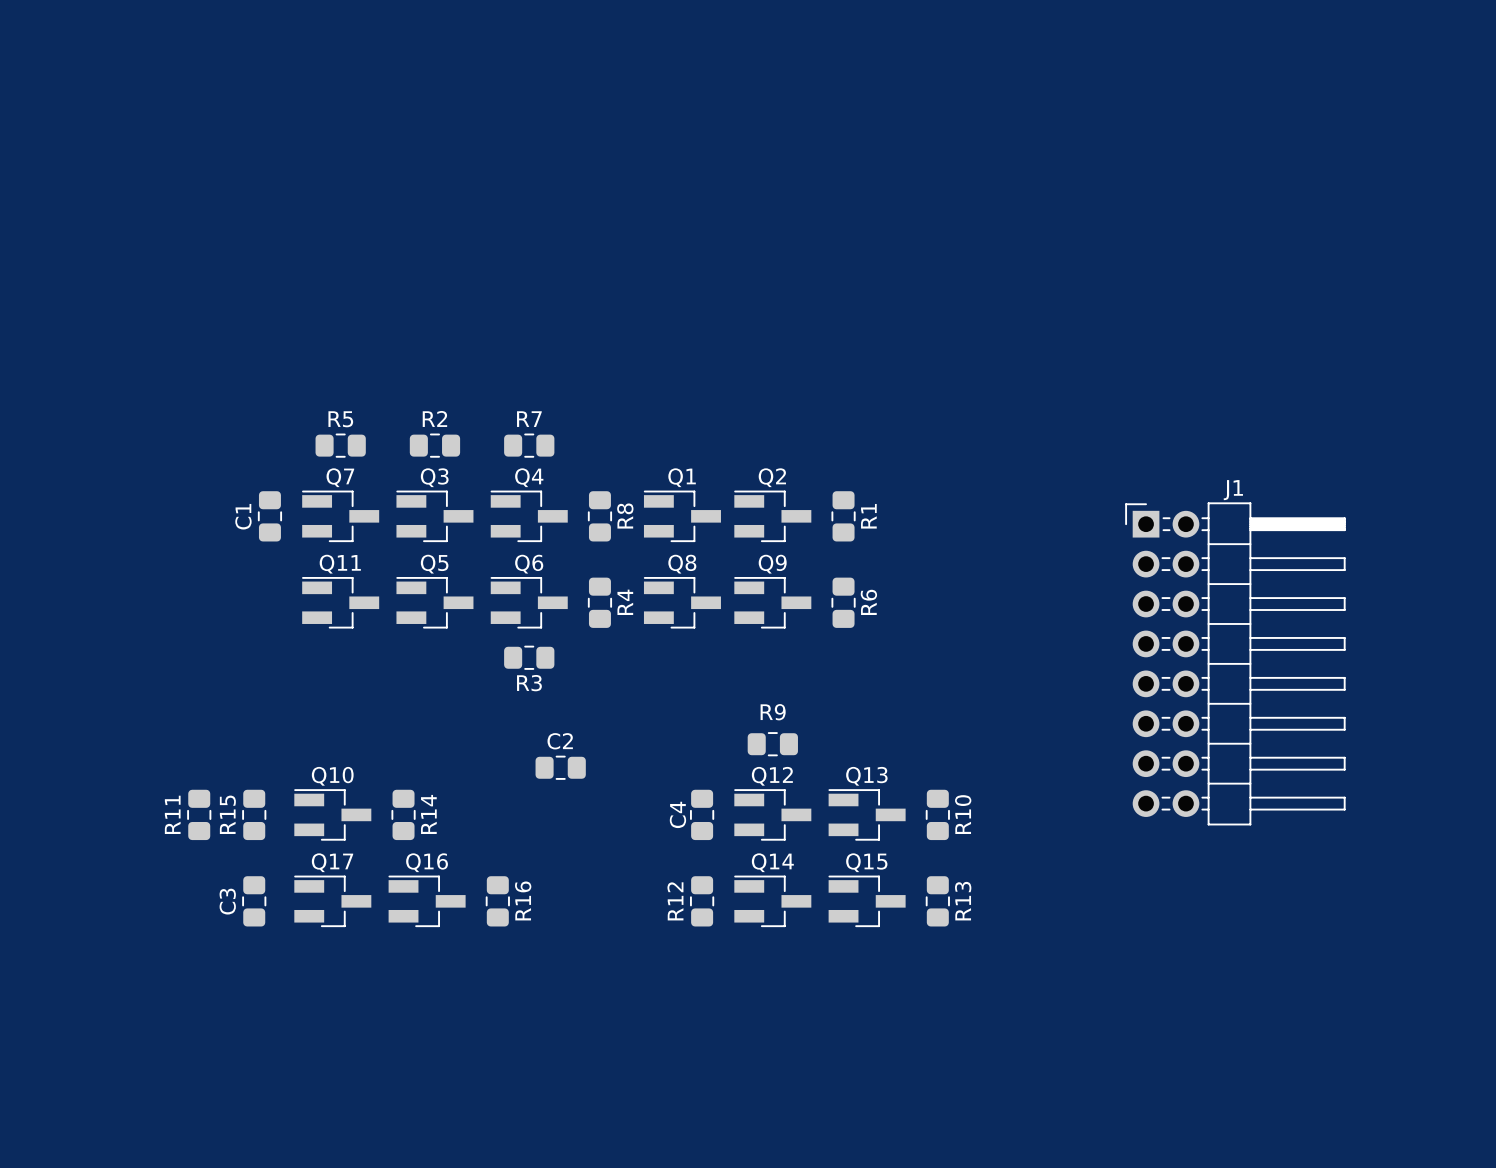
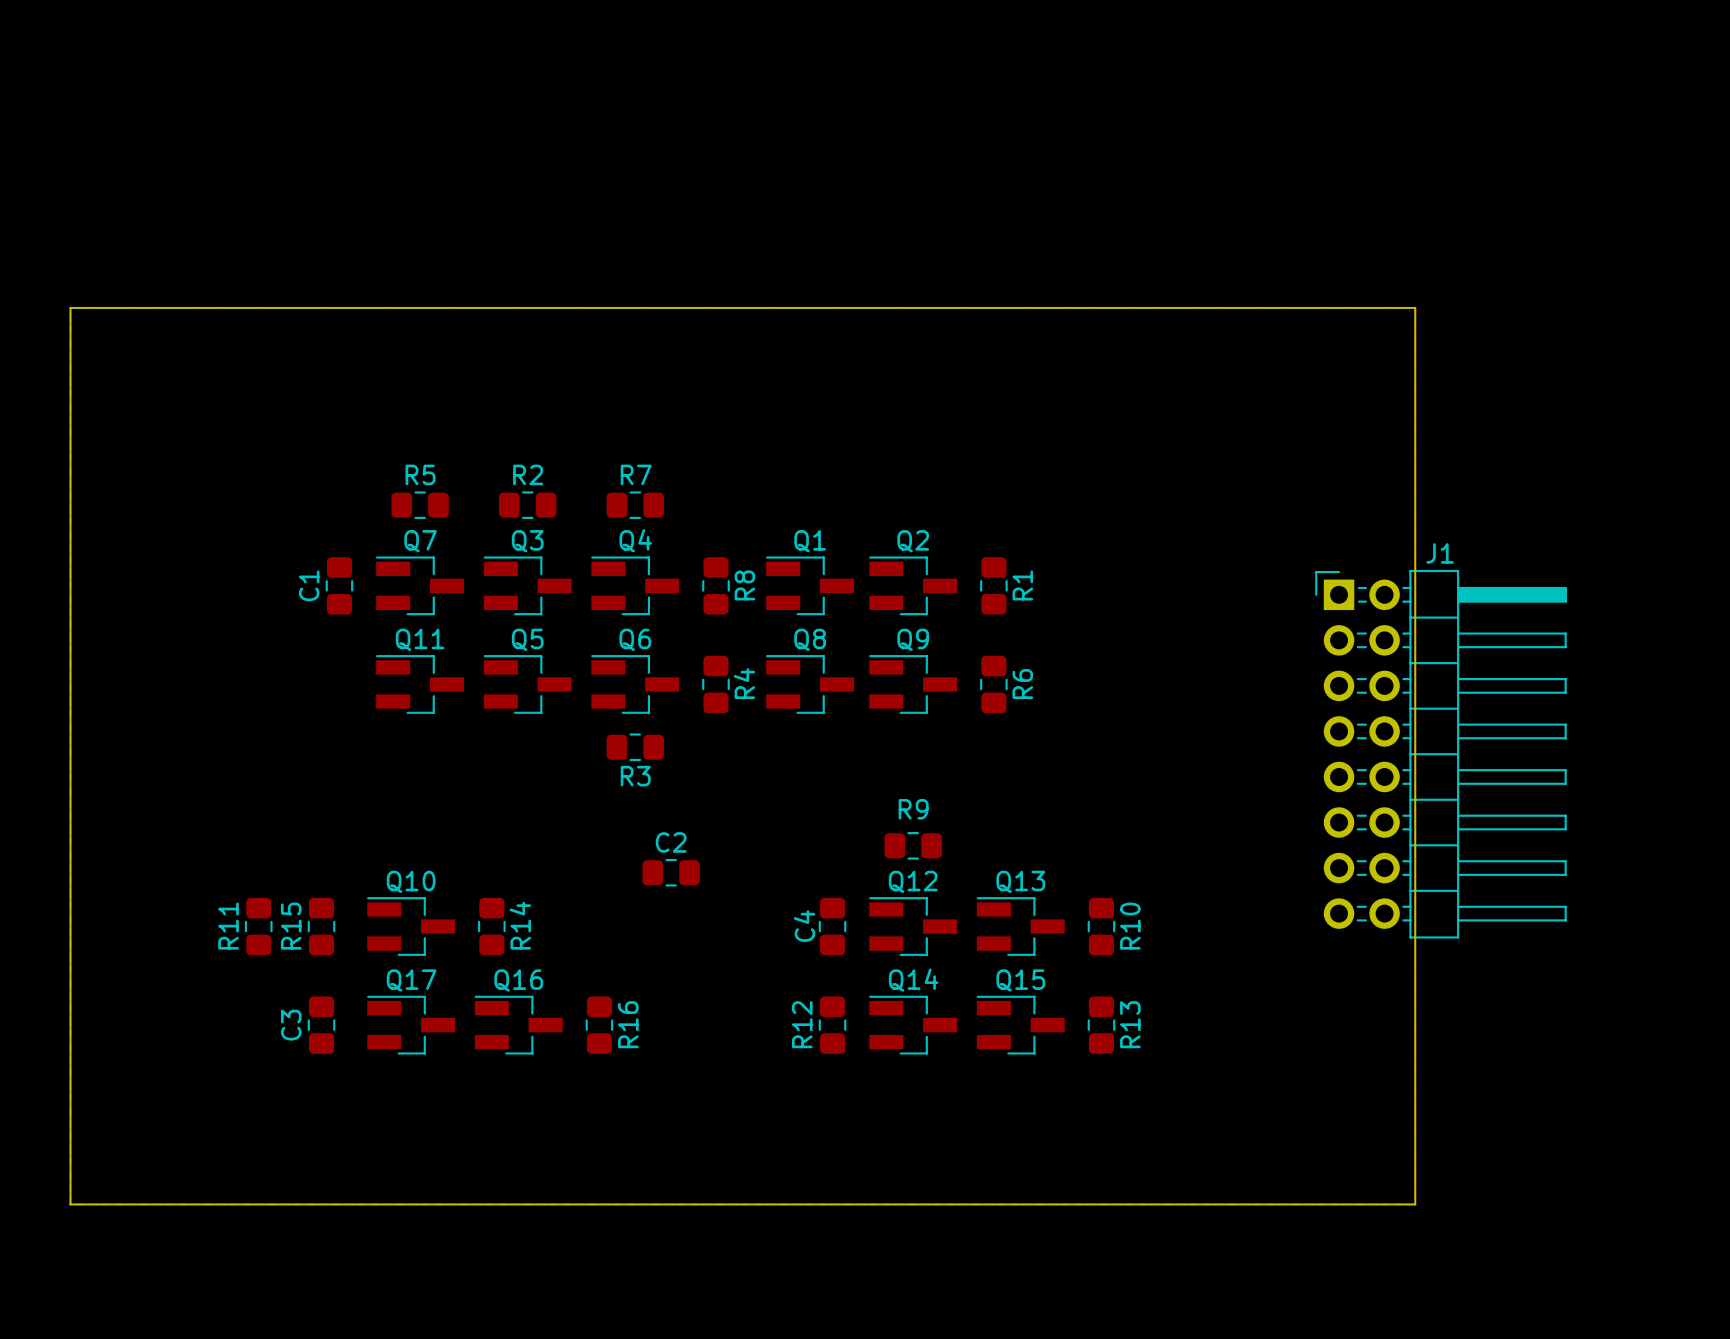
board edge: none -> (70, 307) (70, 1204) (1415, 1204) (1415, 307) (70, 307)

